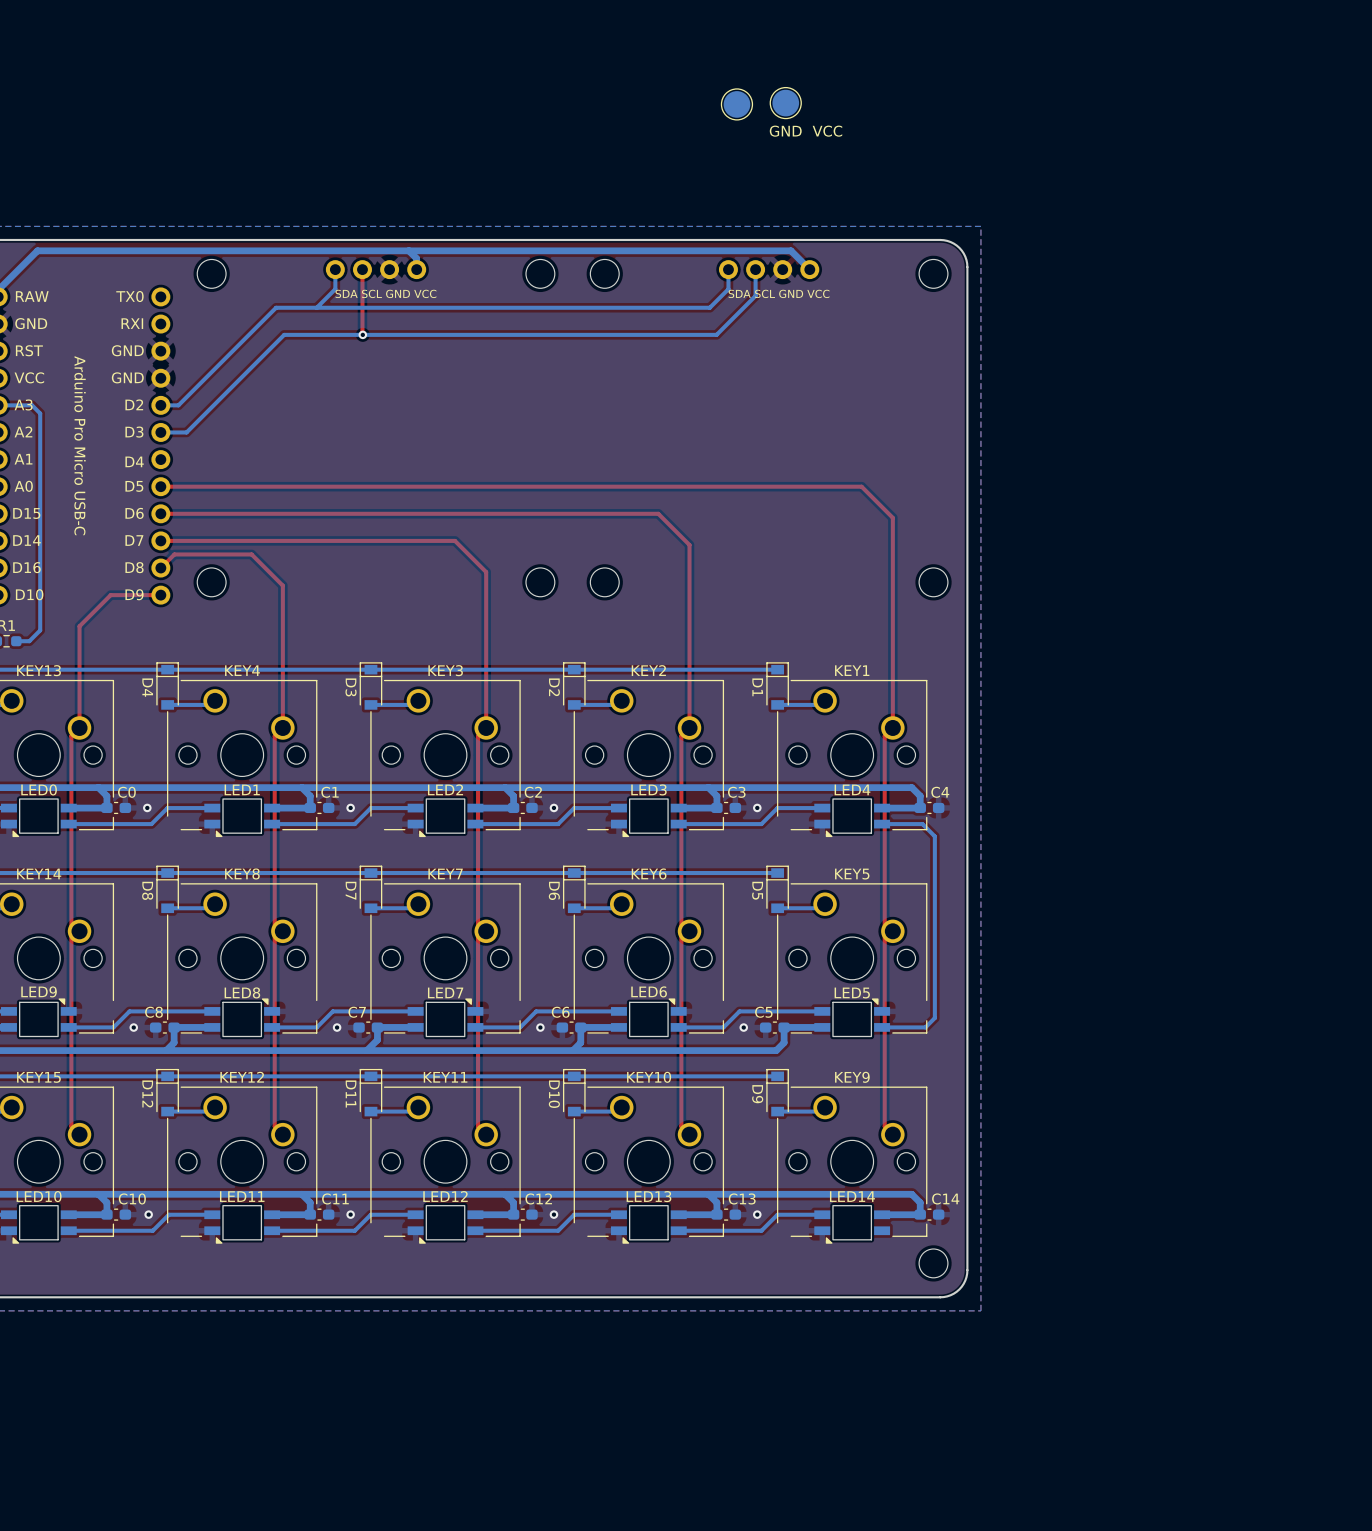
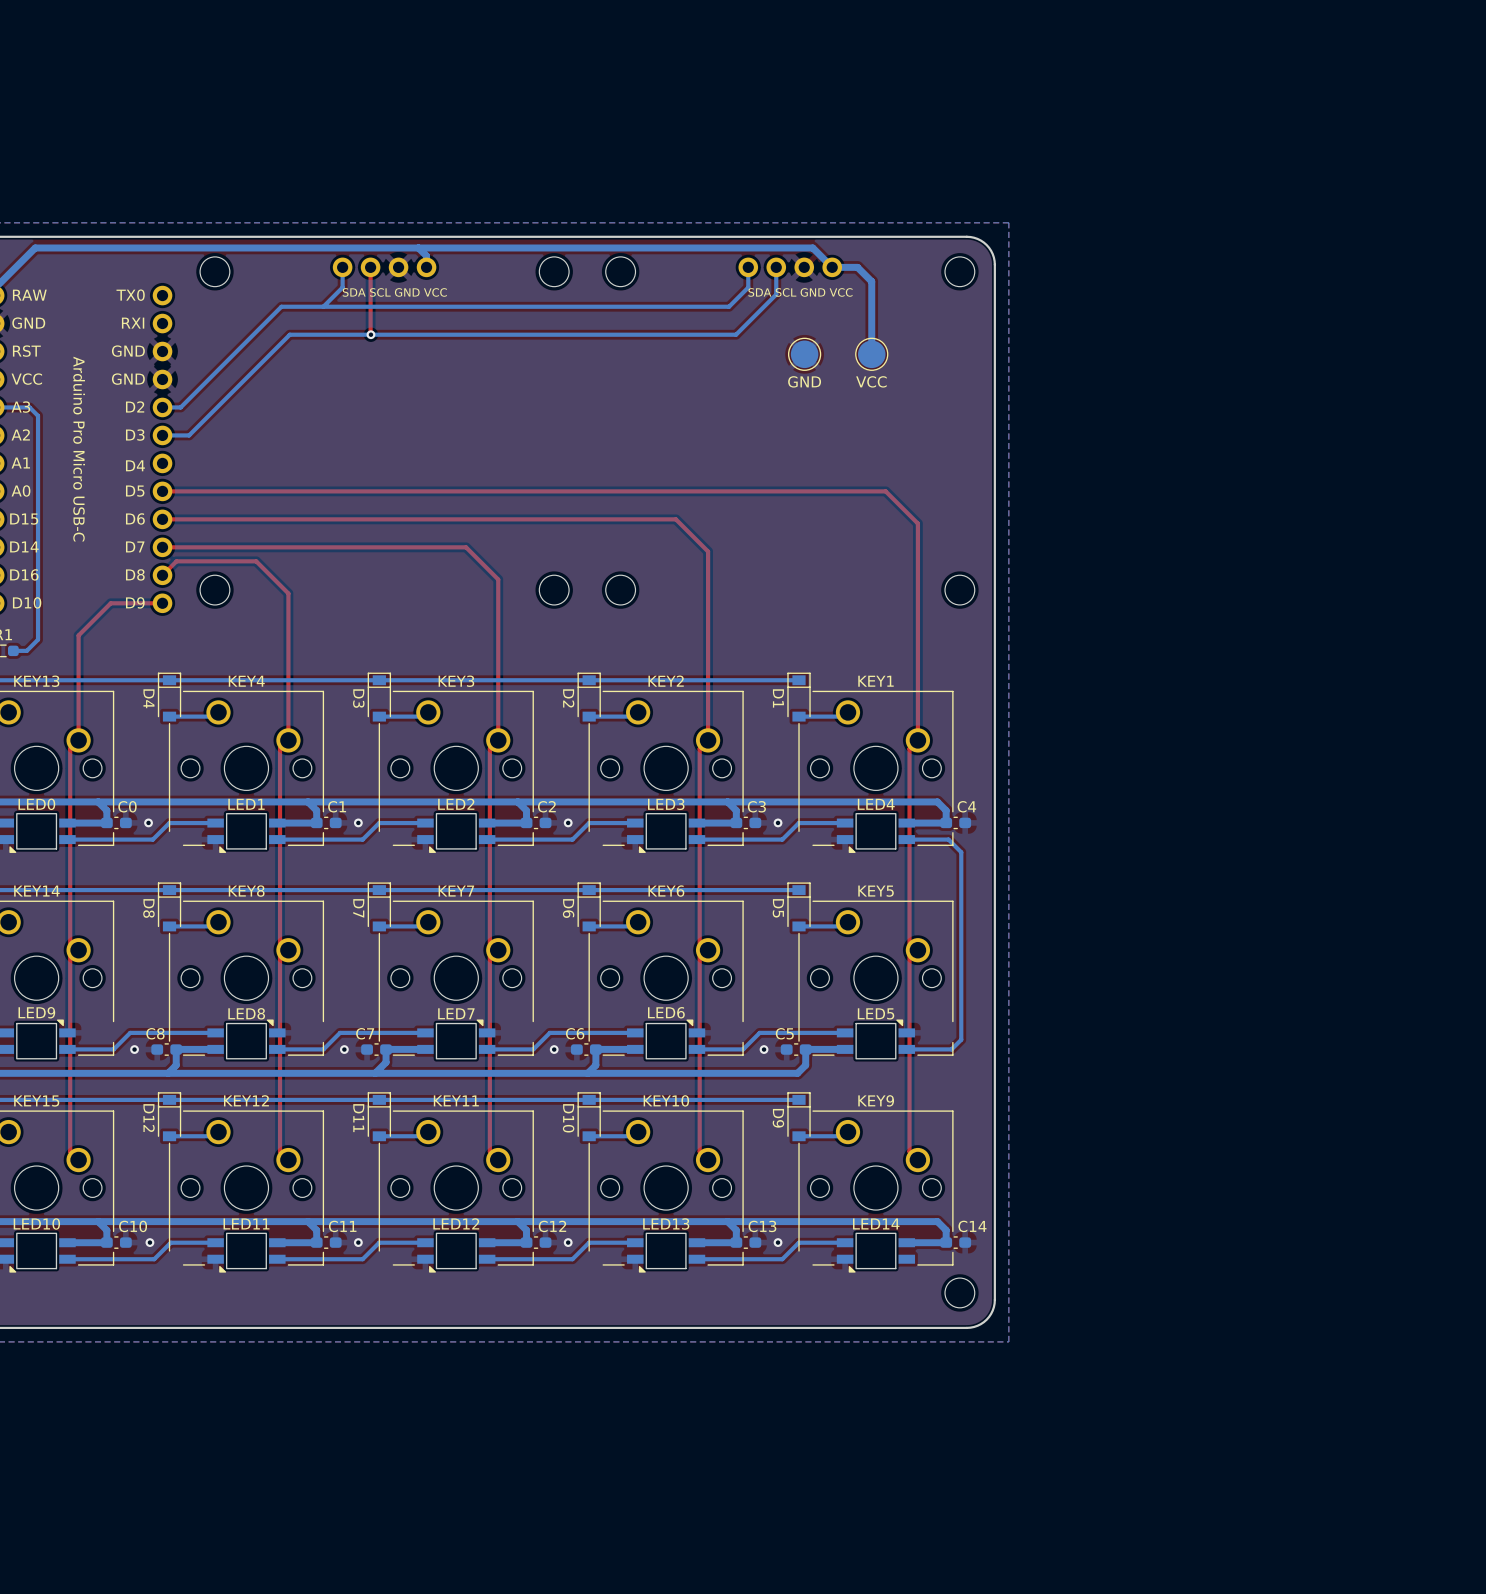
part: (785, 103) -> none
part: (736, 104) -> none
text position: GND (785, 131) -> GND (804, 381)
text position: VCC (827, 131) -> VCC (871, 381)
bottom track: none -> (832, 267) (857, 267) (871, 281) (871, 354)
part: none -> (804, 354)
part: none -> (871, 354)

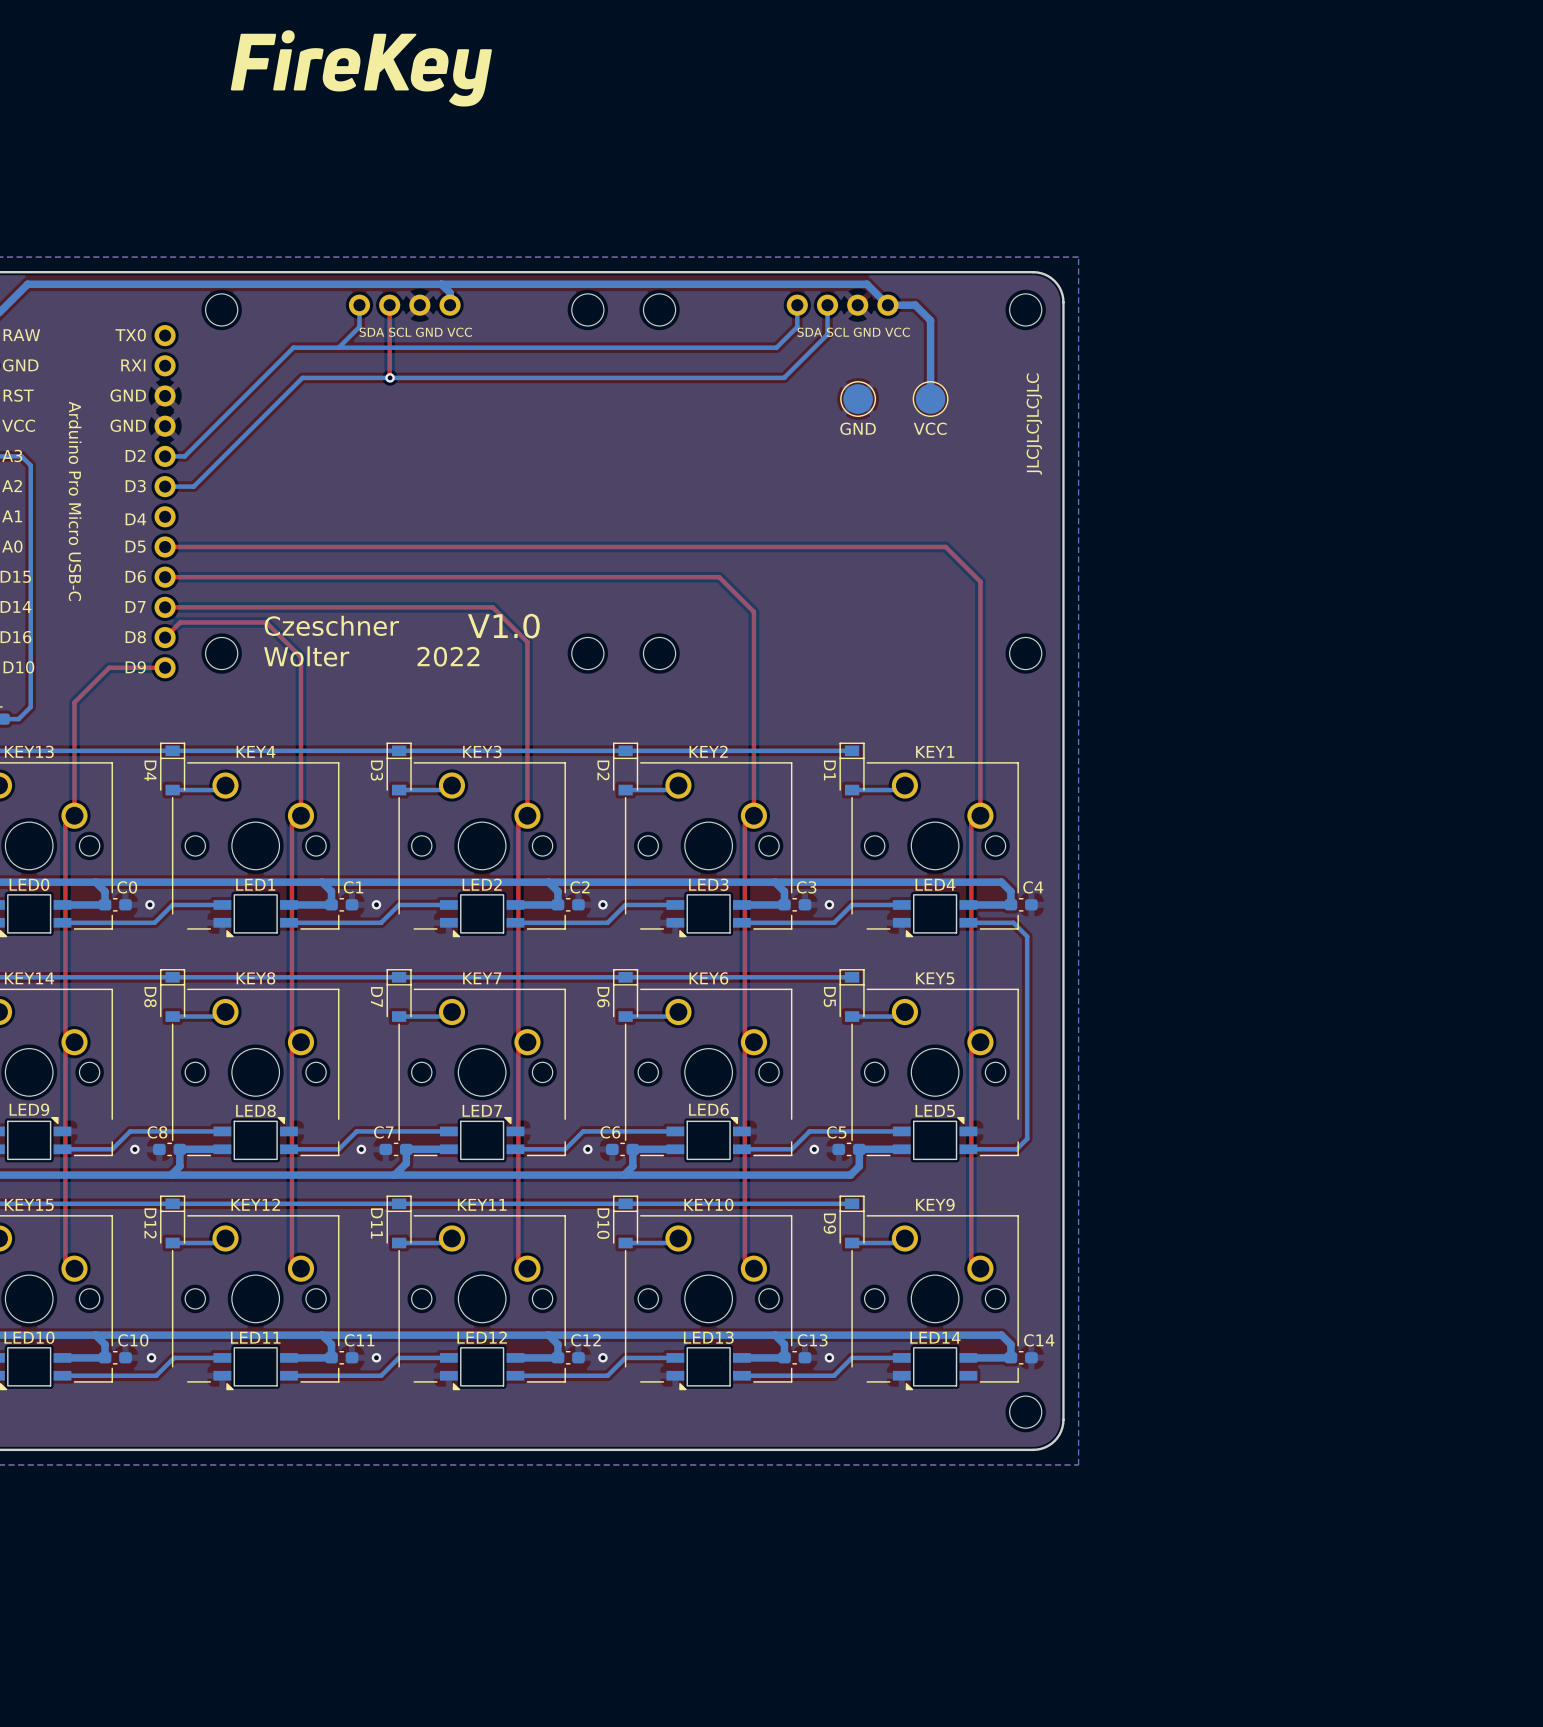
drawing: none -> [230, 30, 492, 107]
text: none -> JLCJLCJLCJLC (1034, 424)
text: none -> Czeschner (331, 625)
text: none -> V1.0 (503, 626)
text: none -> Wolter 2022 (371, 656)

